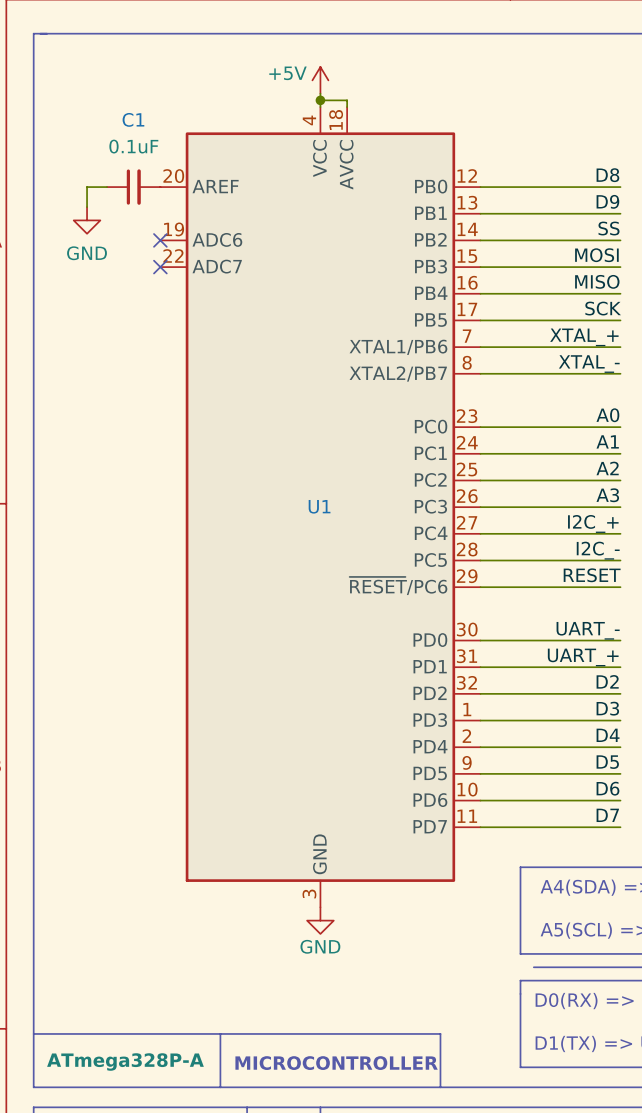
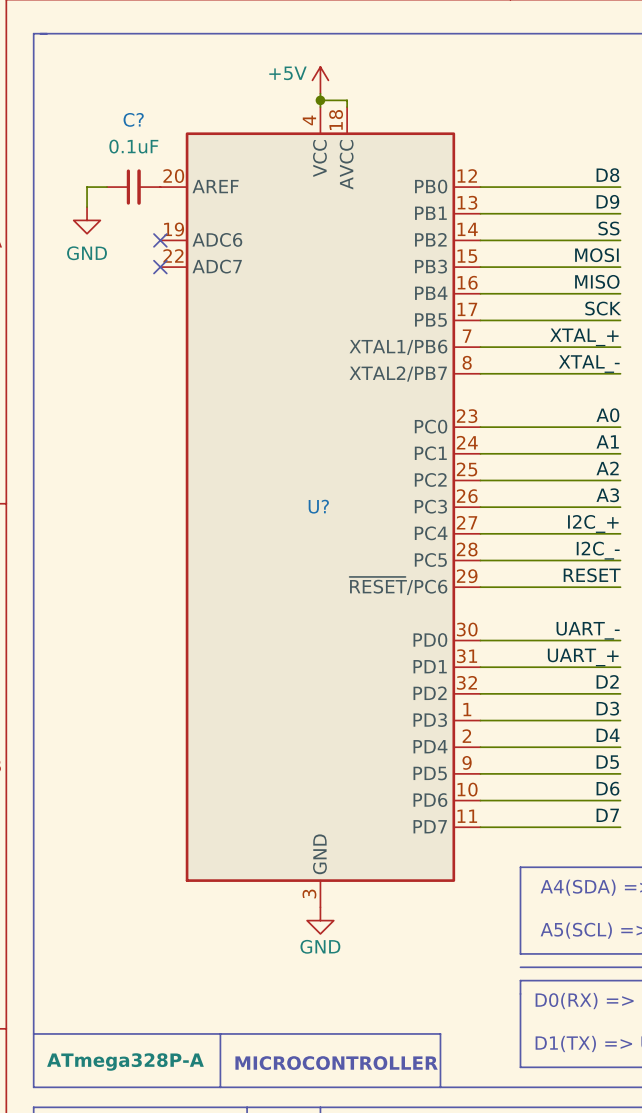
C1 name: C1 (133, 119) -> C? (133, 119)
U1 name: U1 (319, 506) -> U? (318, 506)
line: none -> (520, 967) (533, 967)

